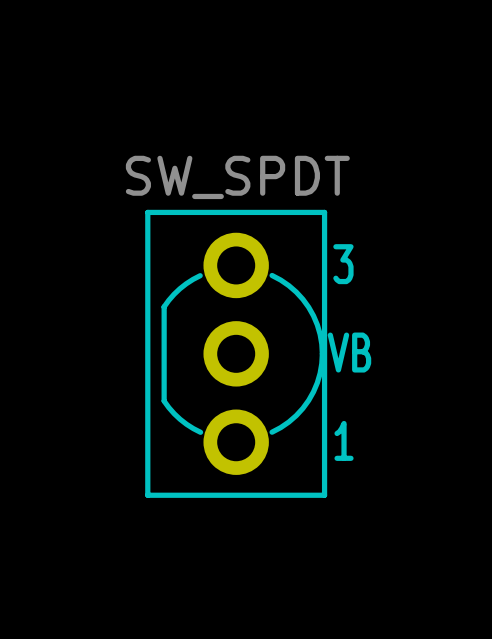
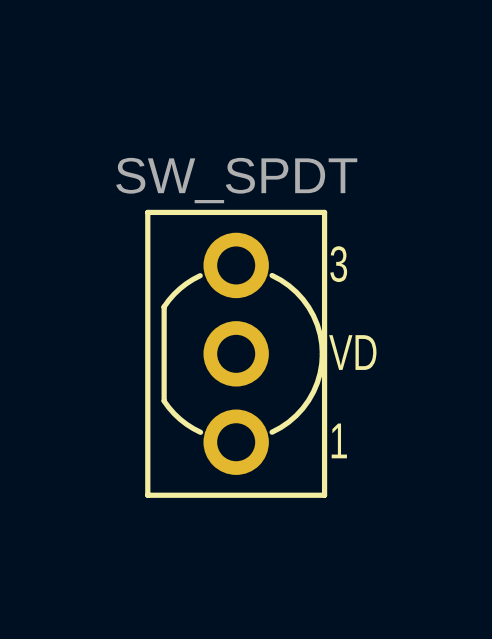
text: VB (349, 352) -> VD (352, 352)

